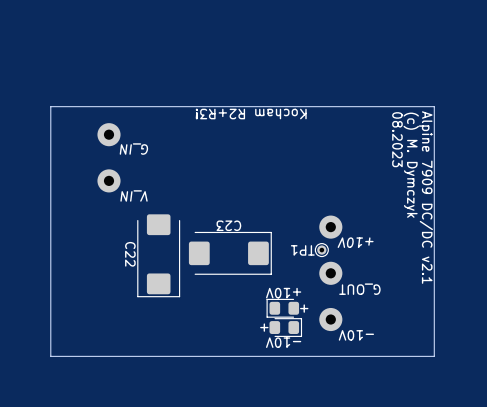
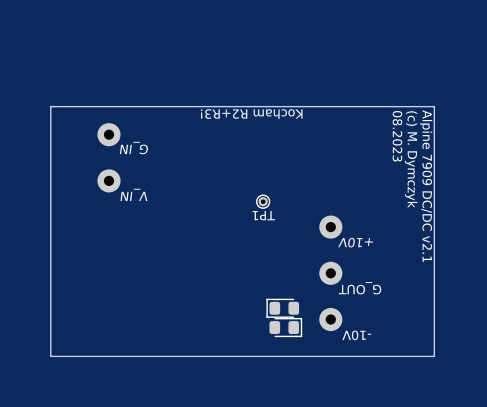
TP1 name position: TP1 (302, 250) -> TP1 (263, 215)
TP1 position: (321, 250) -> (263, 201)
C23: (230, 253) -> none
C22: (158, 255) -> none
text: +10V (283, 293) -> none
text: + (304, 308) -> none
text: + (264, 327) -> none
text: -10V (283, 342) -> none

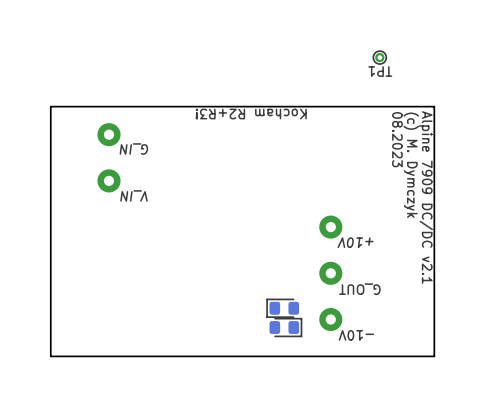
TP1 position: (263, 201) -> (379, 57)

